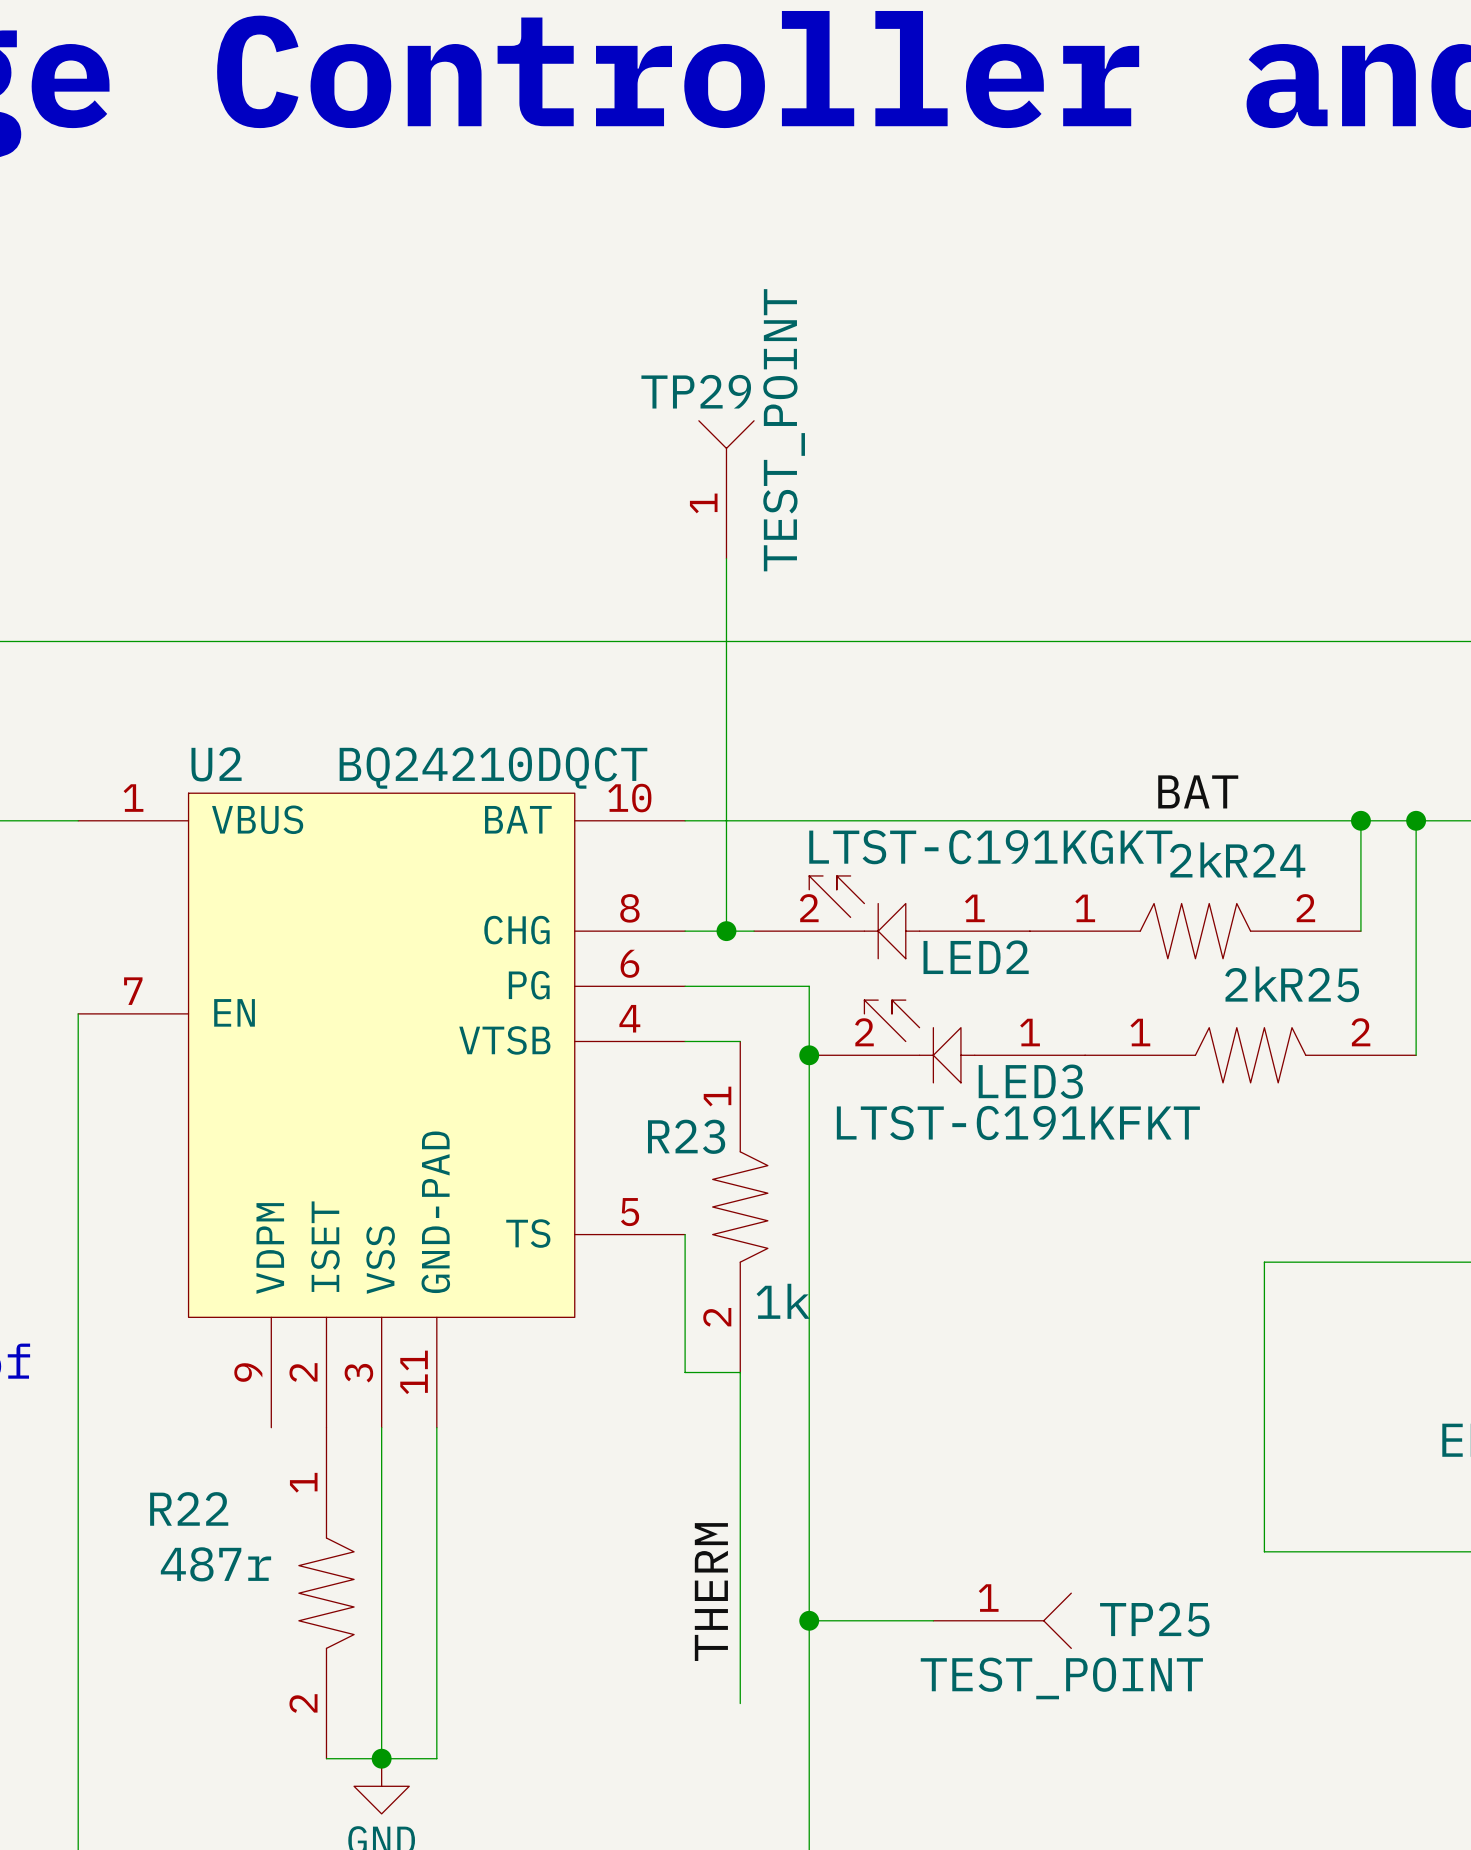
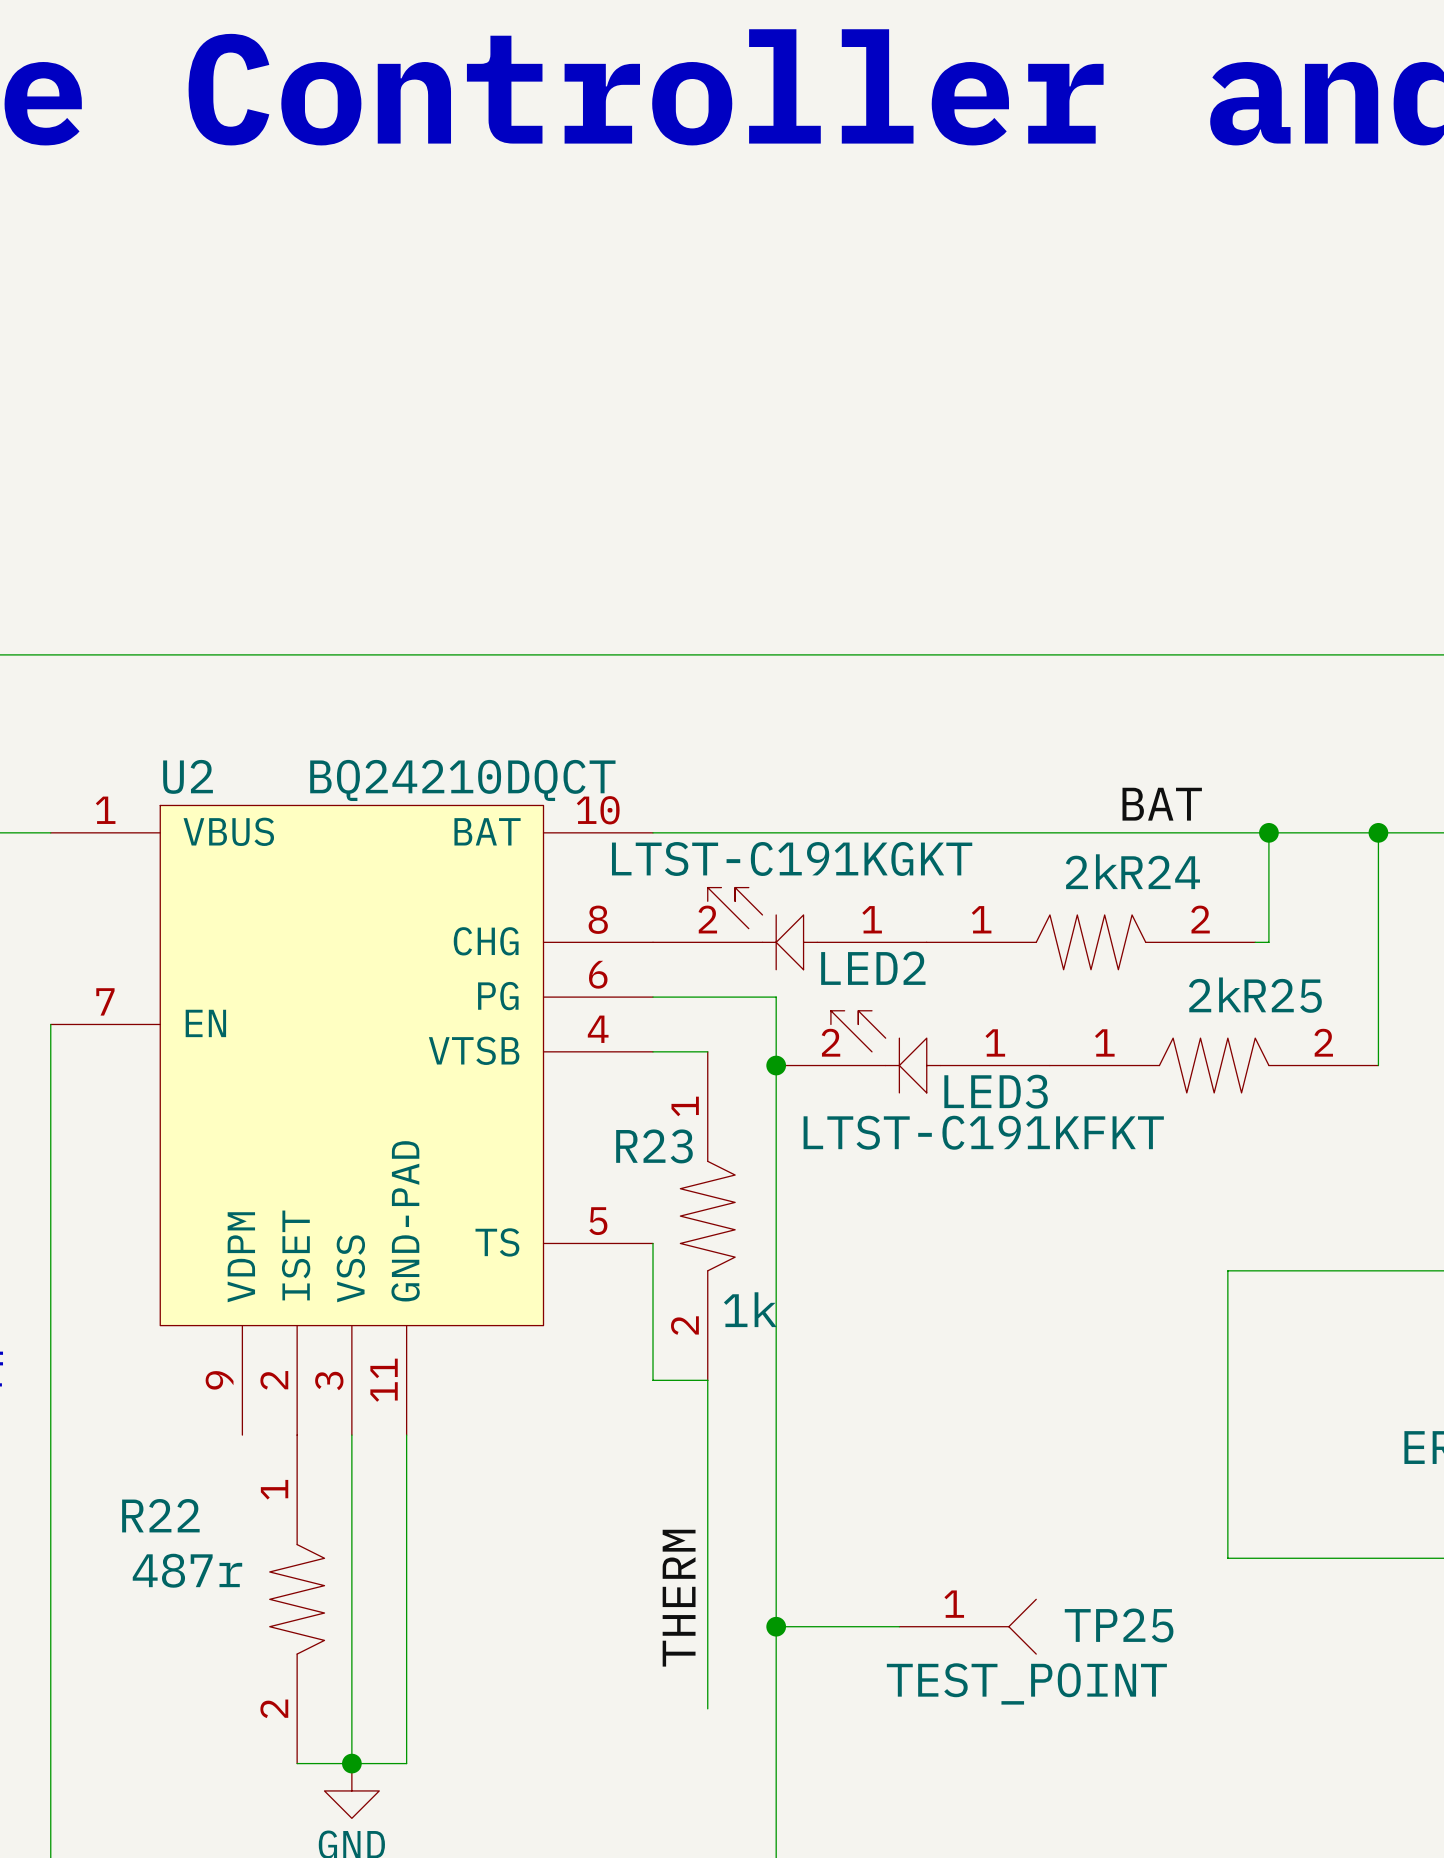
TP29: TEST_POINT (726, 489) -> none
wire: (726, 558) (726, 931) -> none
wire: none -> (1268, 832) (1268, 942) (1255, 942)
wire: (1360, 820) (1360, 931) -> none
junction position: (1360, 820) -> (1268, 832)
LED2 value position: LTST-C191KGKT (990, 847) -> LTST-C191KGKT (792, 858)
LED2 position: (891, 917) -> (789, 928)
junction: (726, 931) -> none
R24 position: (1195, 931) -> (1090, 942)

